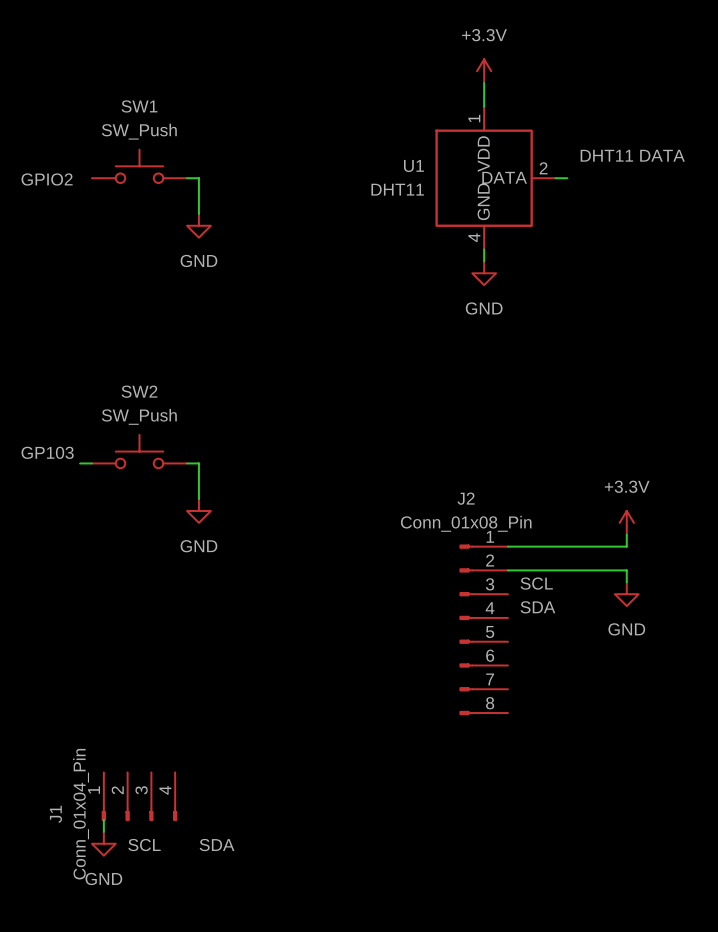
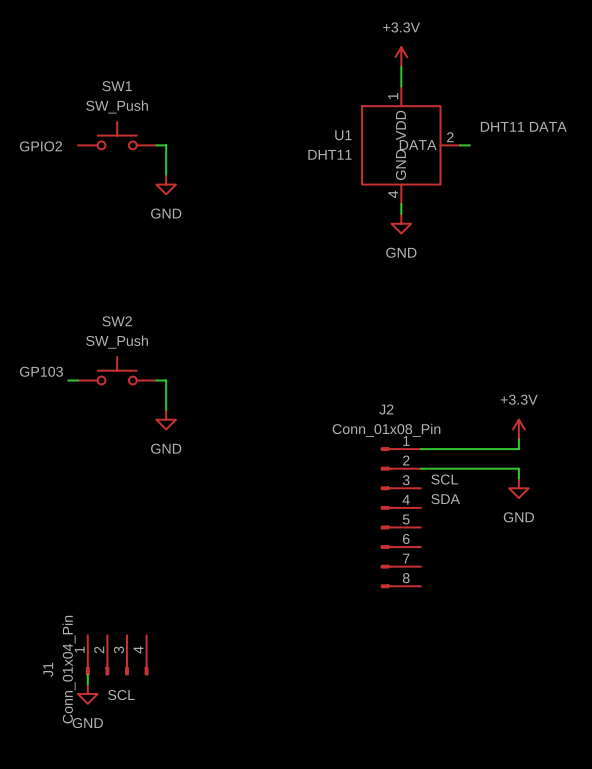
label: SDA (217, 845) -> none

